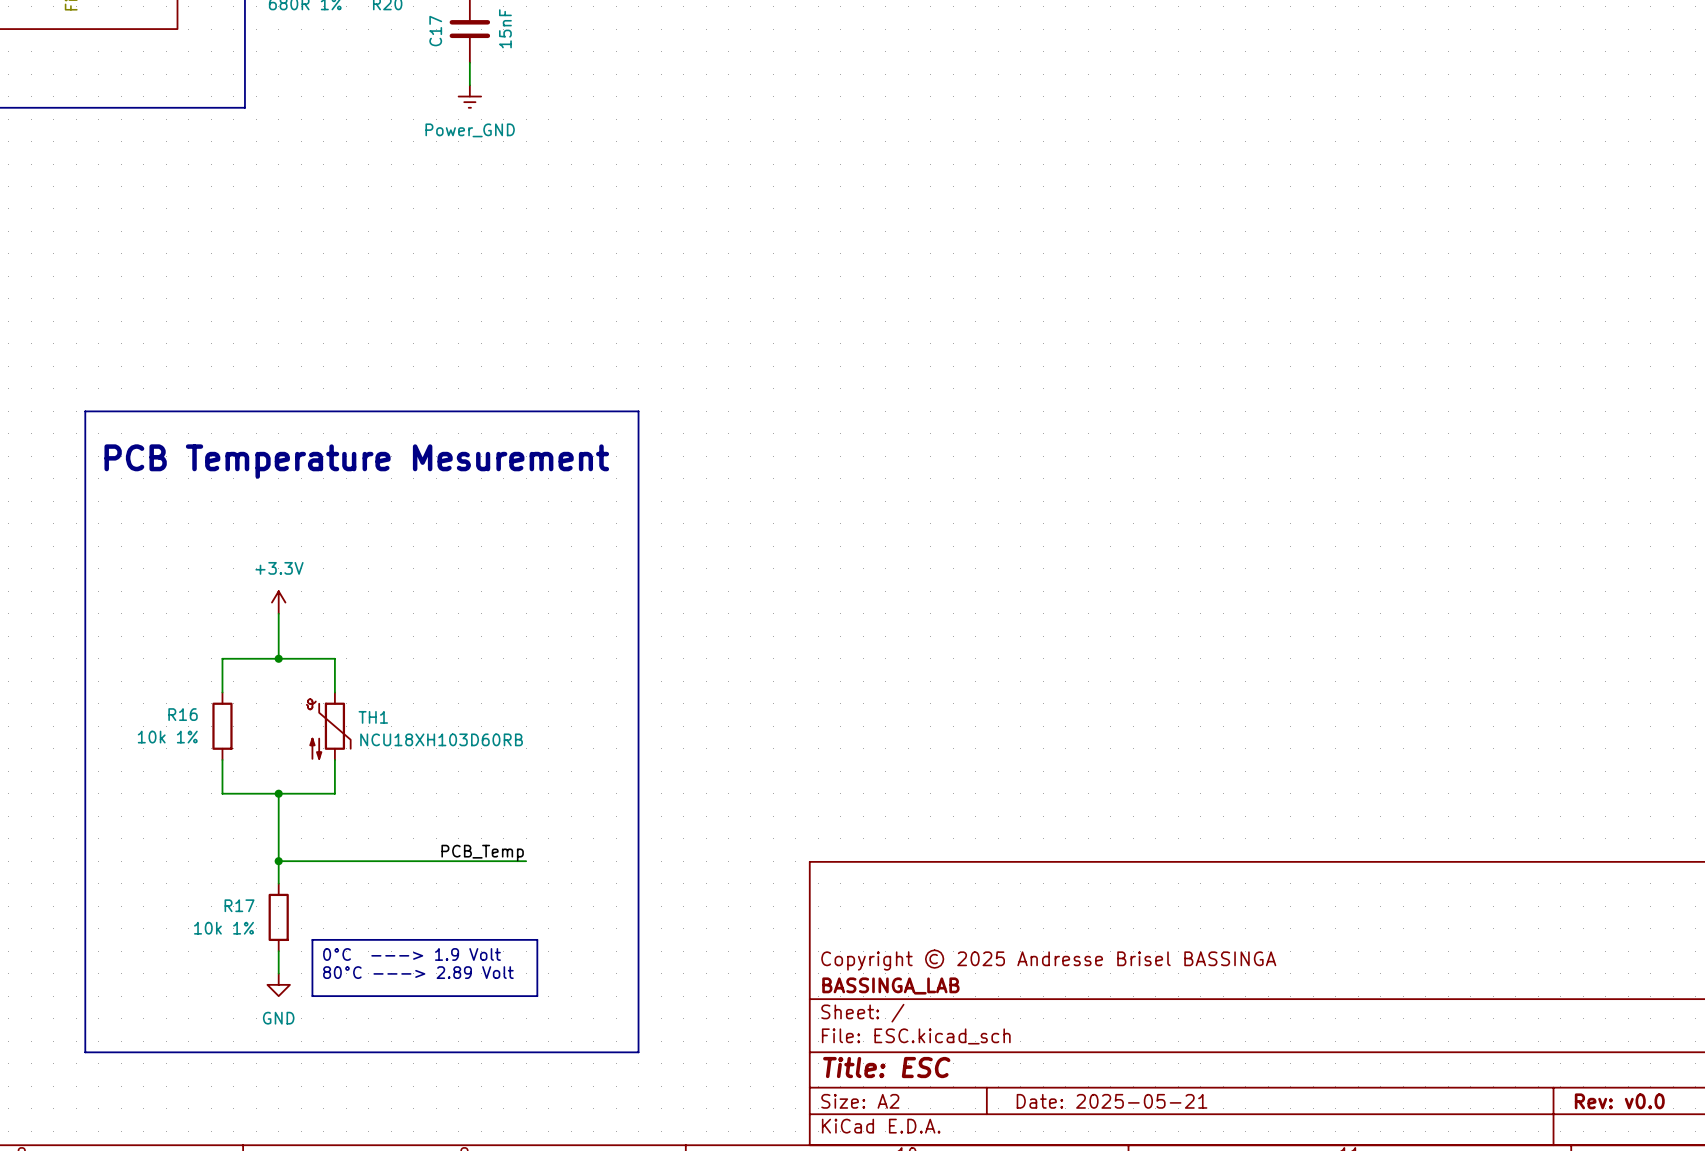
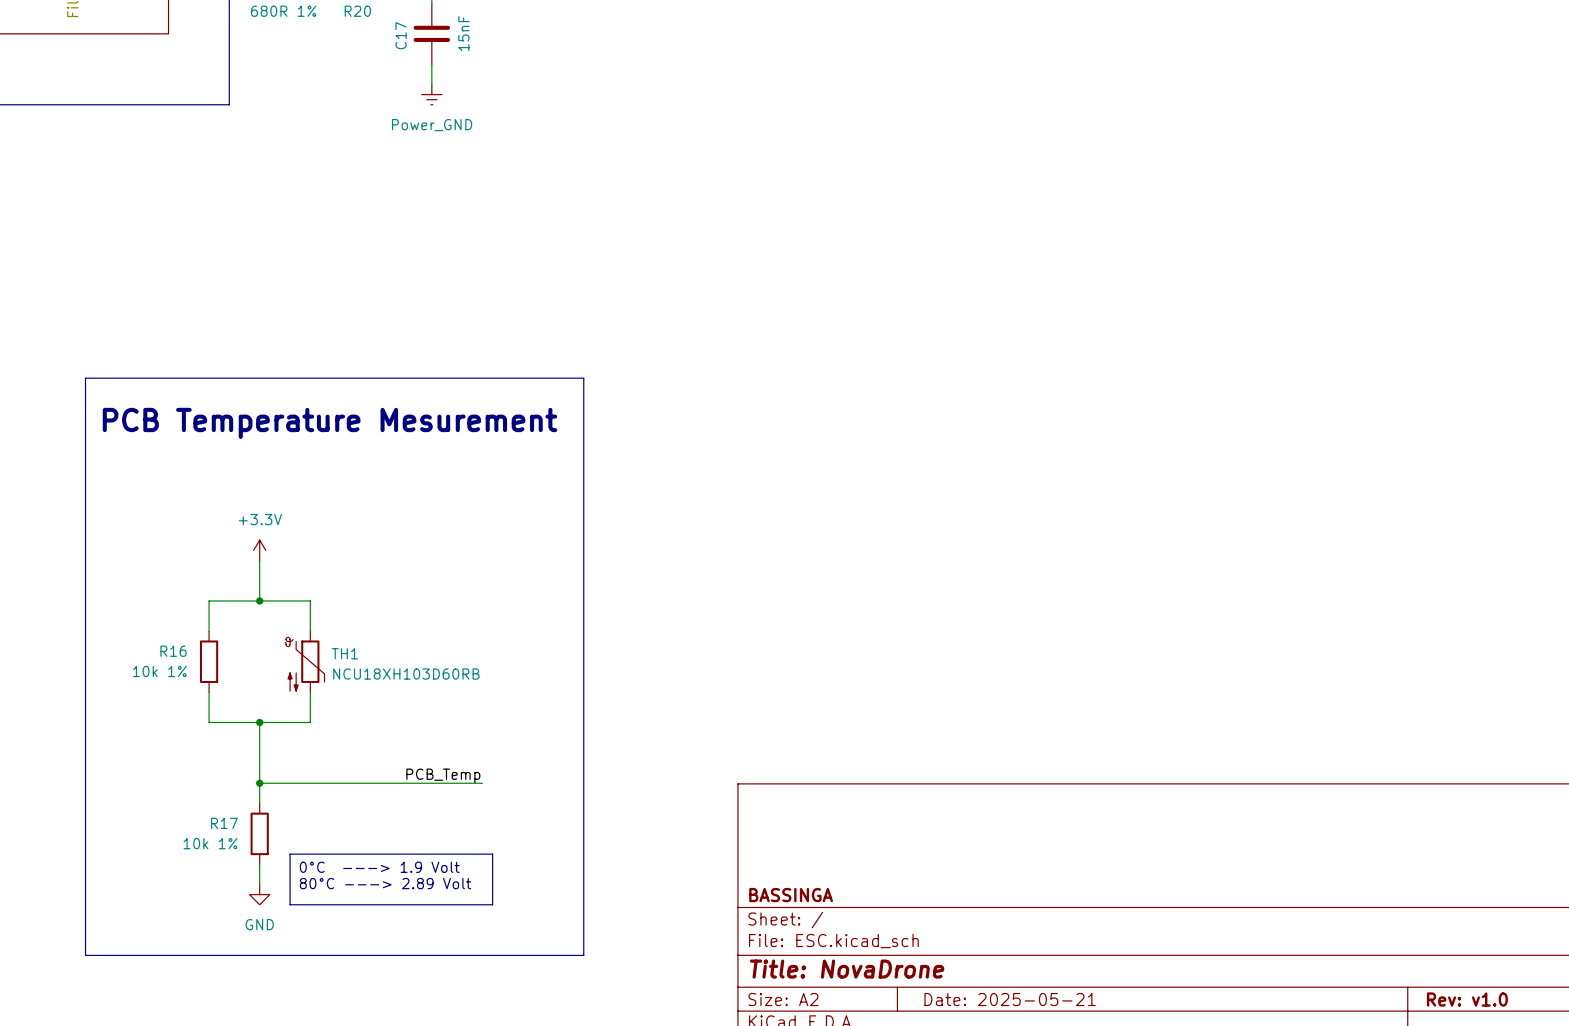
title block: Copyright © 2025 Andresse Brisel BASSINGA (1048, 960) -> none
title block: BASSINGA_LAB (890, 985) -> BASSINGA (791, 895)
title block: Title: ESC (886, 1067) -> Title: NovaDrone (847, 969)
title block: Rev: v0.0 (1619, 1101) -> Rev: v1.0 (1467, 999)

